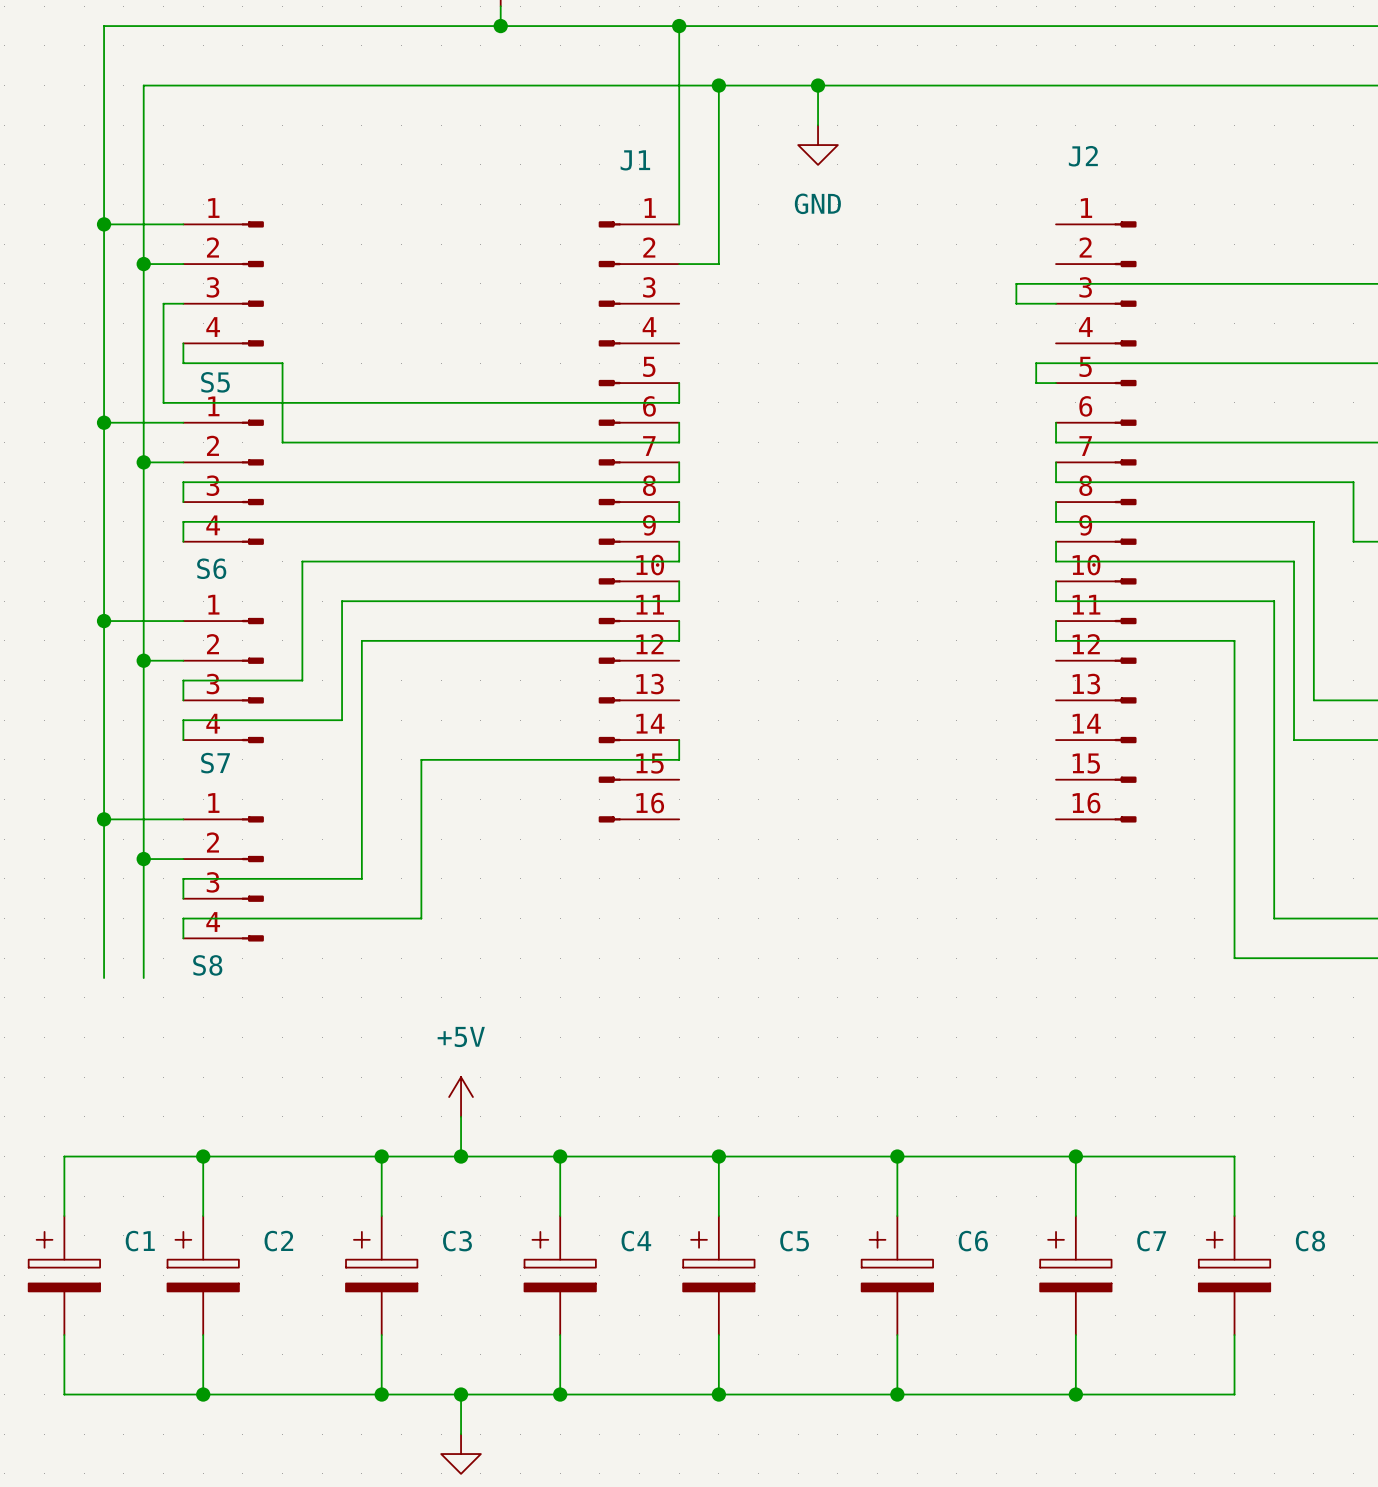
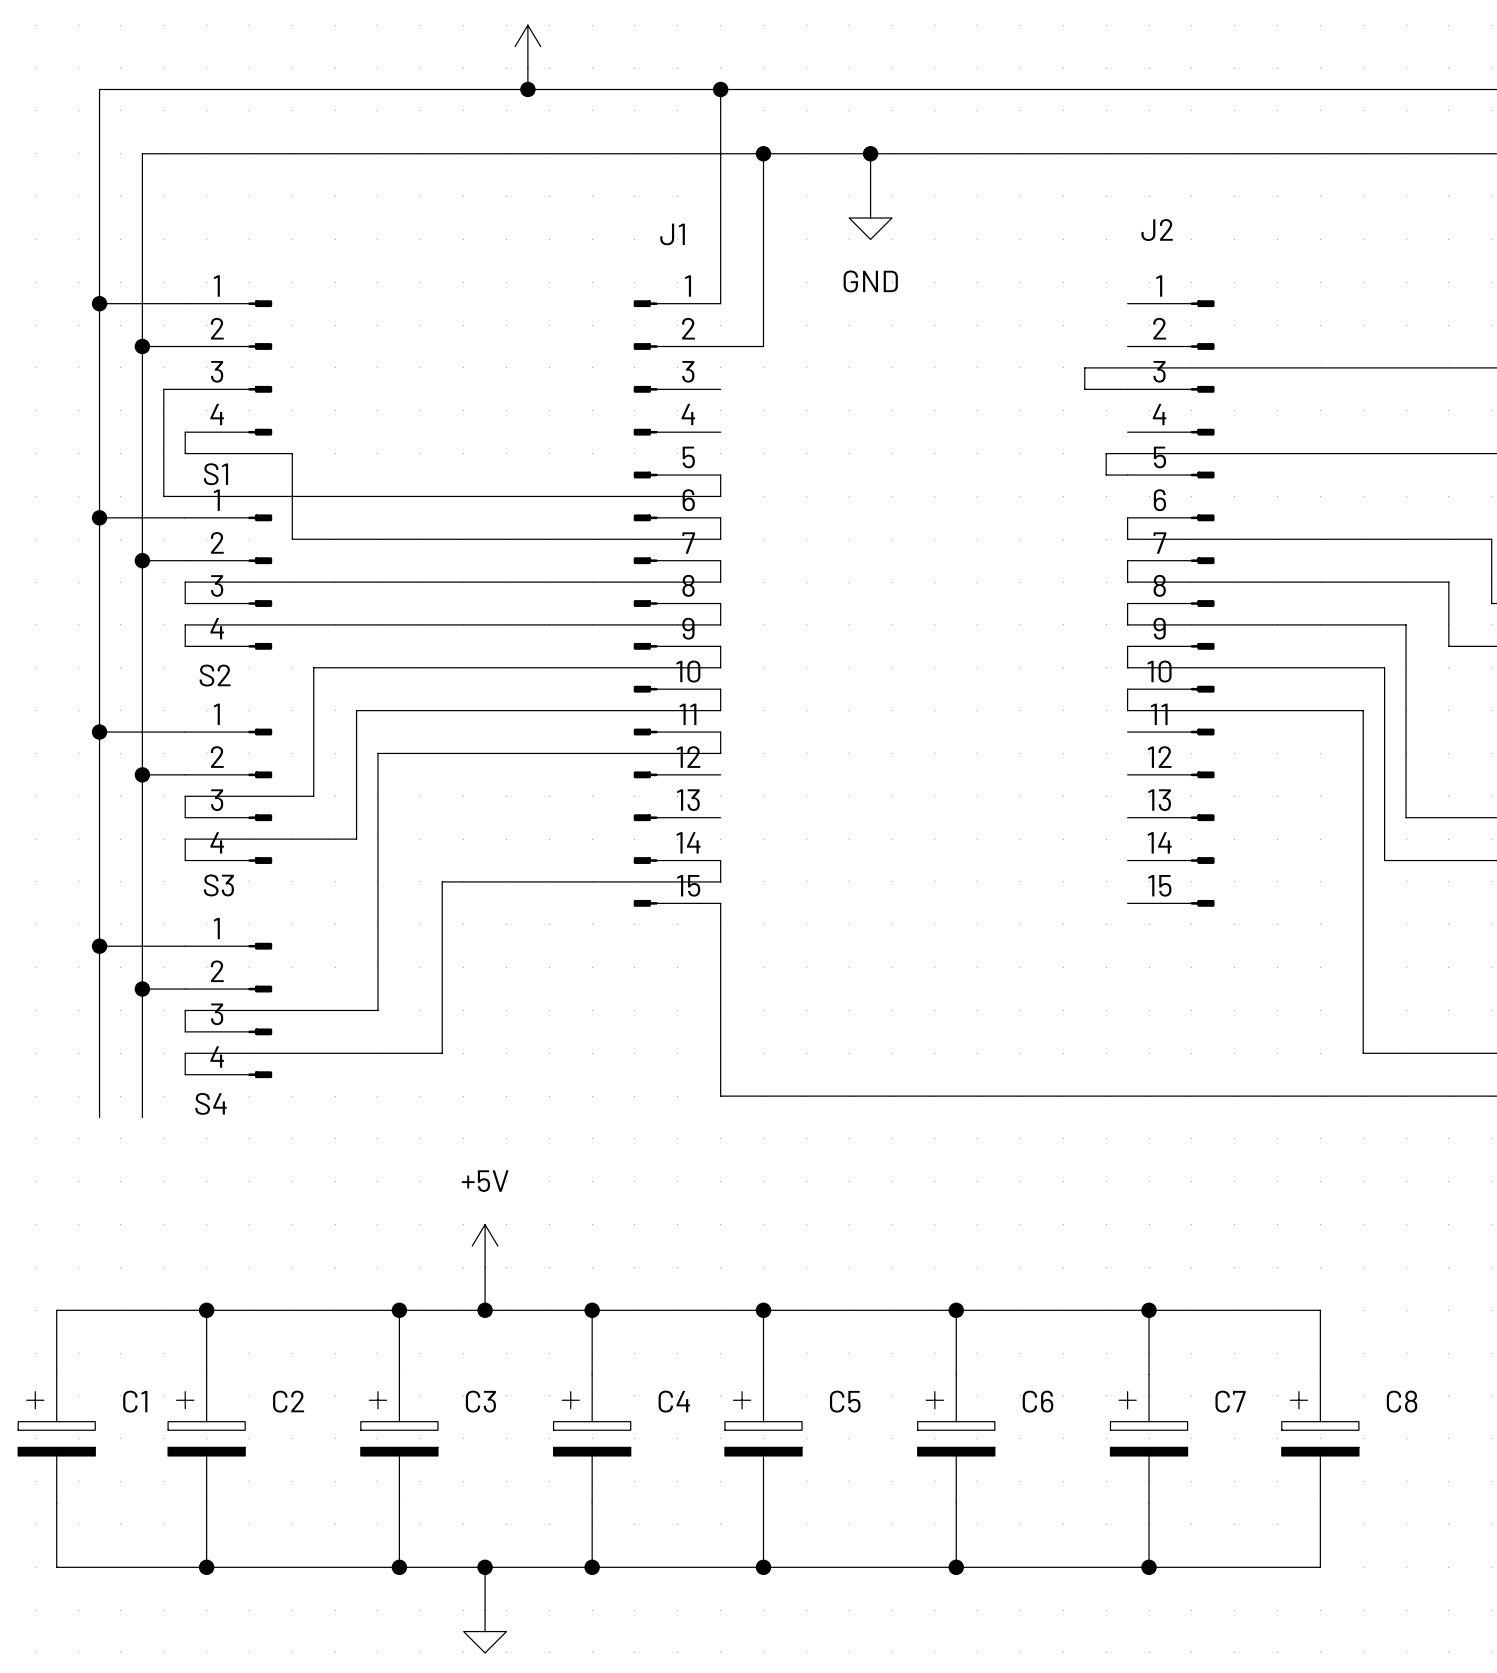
J1 symbol: [598, 221, 680, 823] -> [633, 300, 721, 907]
J2 symbol: [1056, 221, 1137, 823] -> [1127, 300, 1215, 907]
S5 name: S5 (215, 382) -> S1 (216, 474)
S6 name: S6 (211, 568) -> S2 (215, 675)
wire: (1056, 621) (1056, 640) (1234, 640) (1234, 958) -> (720, 903) (720, 1096) (1320, 1096)
S7 name: S7 (215, 763) -> S3 (218, 885)
S8 name: S8 (207, 965) -> S4 (211, 1103)

